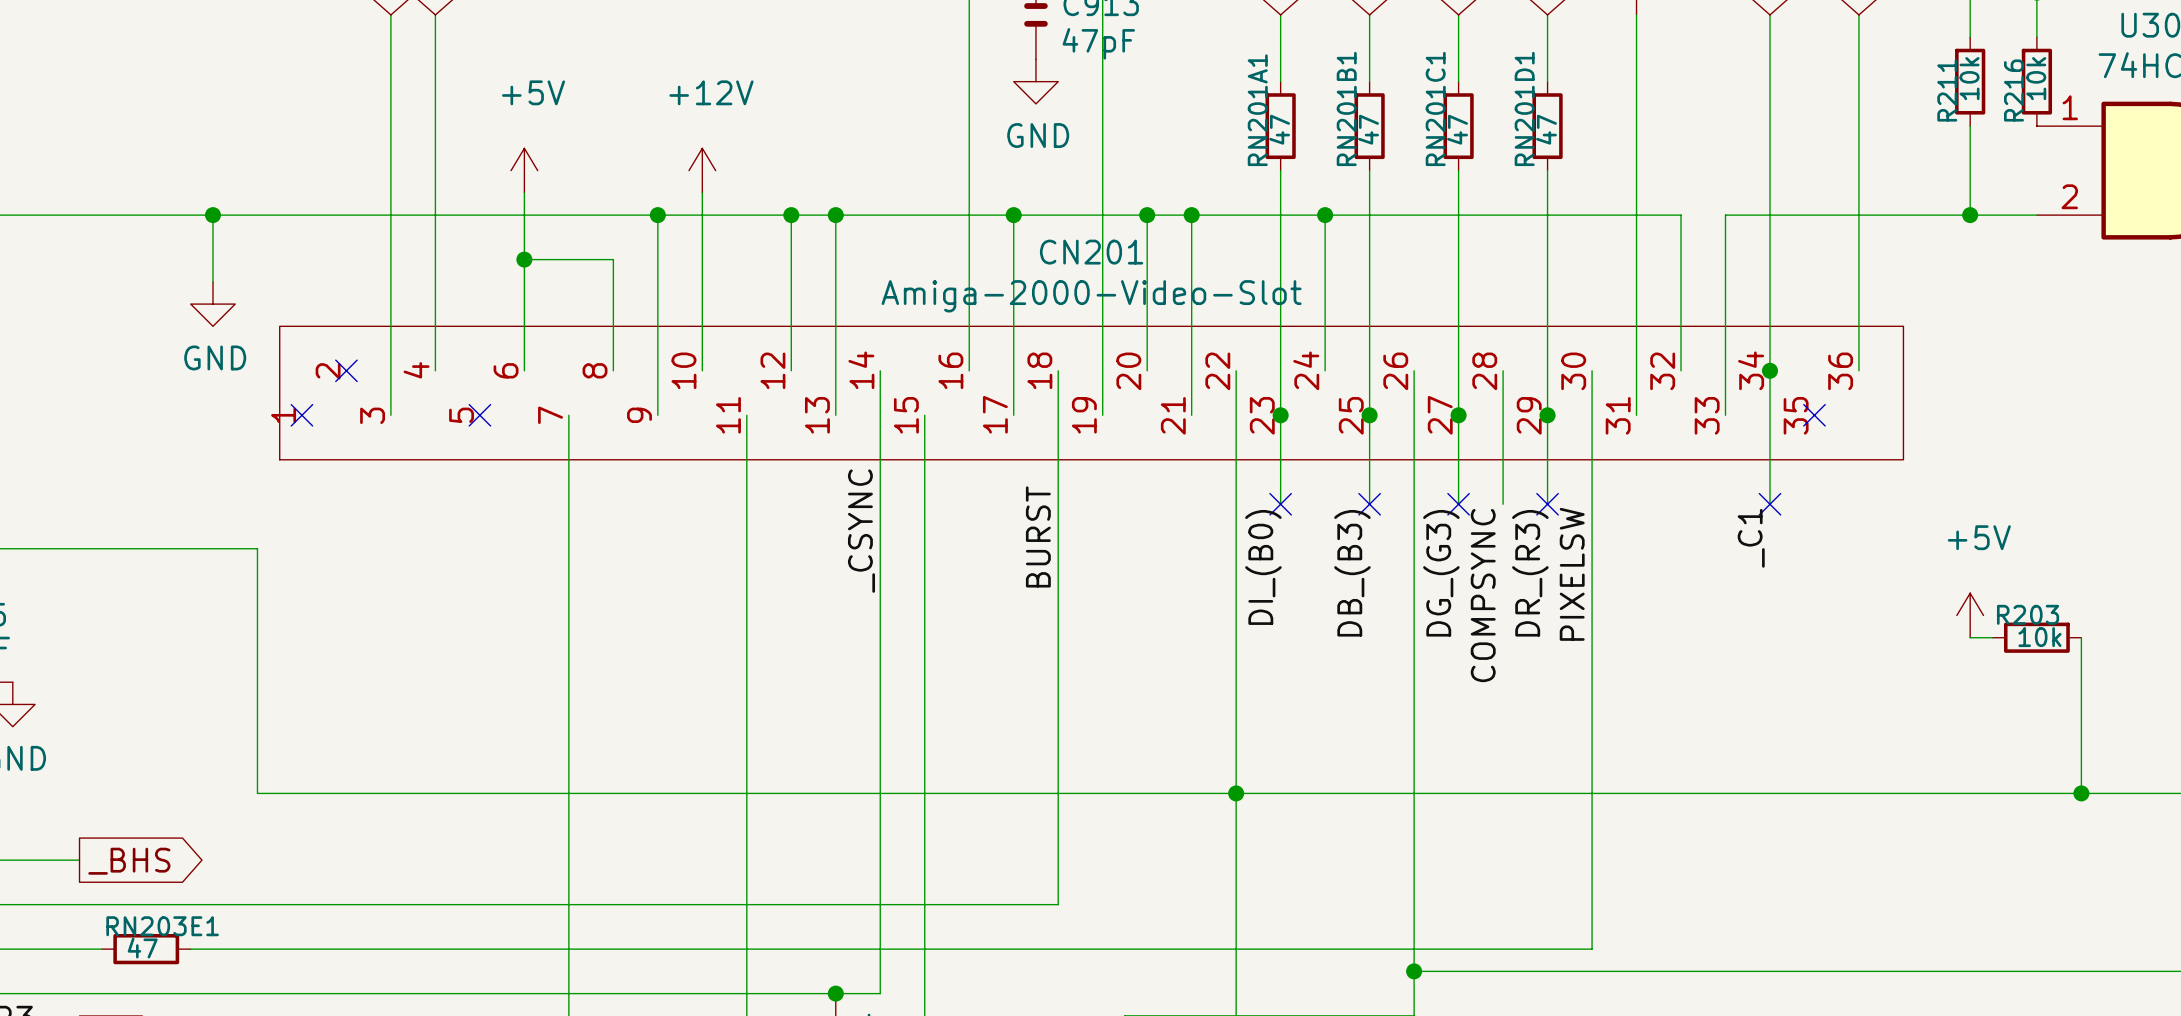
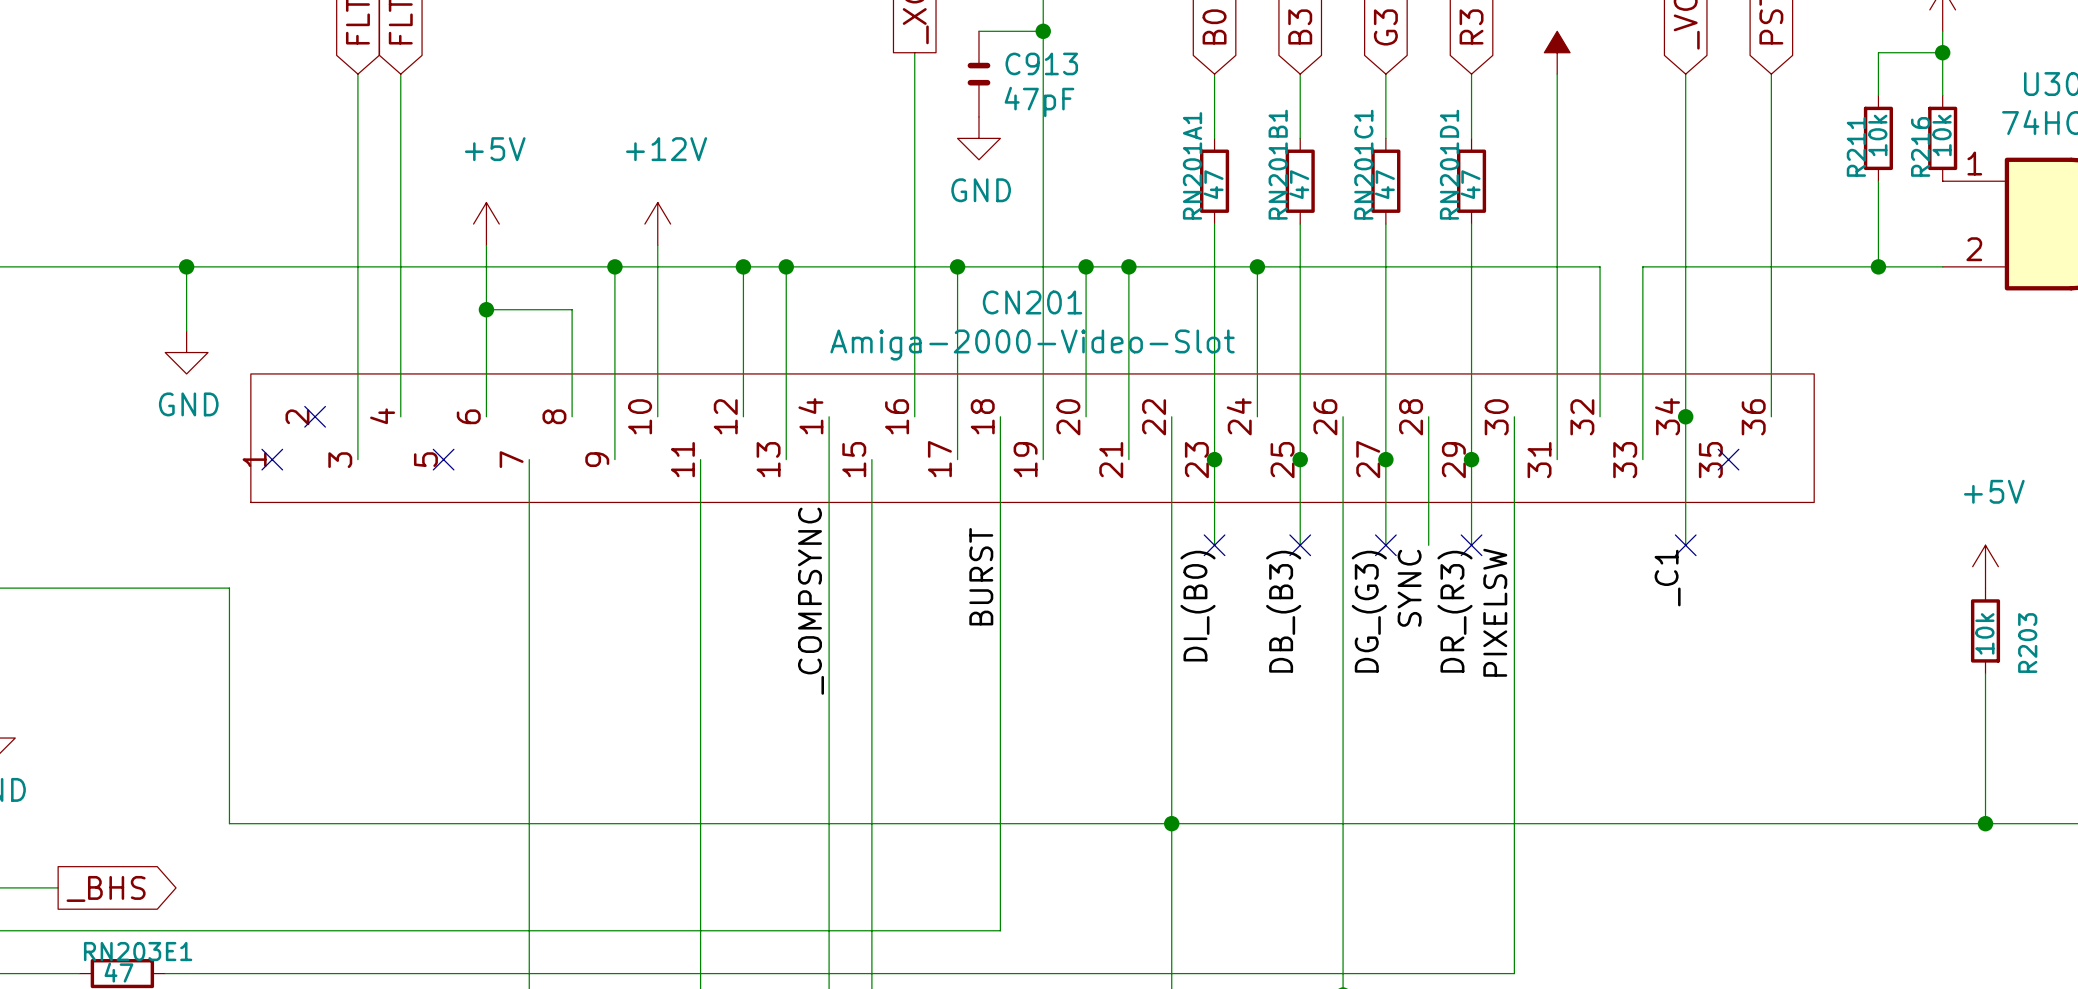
label: _CSYNC (861, 531) -> _COMPSYNC (810, 601)
label: COMPSYNC (1483, 595) -> SYNC (1409, 588)
power symbol position: +5V (1970, 615) -> +5V (1985, 566)
wire: (1970, 637) (1992, 637) -> none
R203 rotation: 0° (2036, 637) -> 90° clockwise (1985, 630)
R203 position: (2036, 637) -> (1985, 630)

